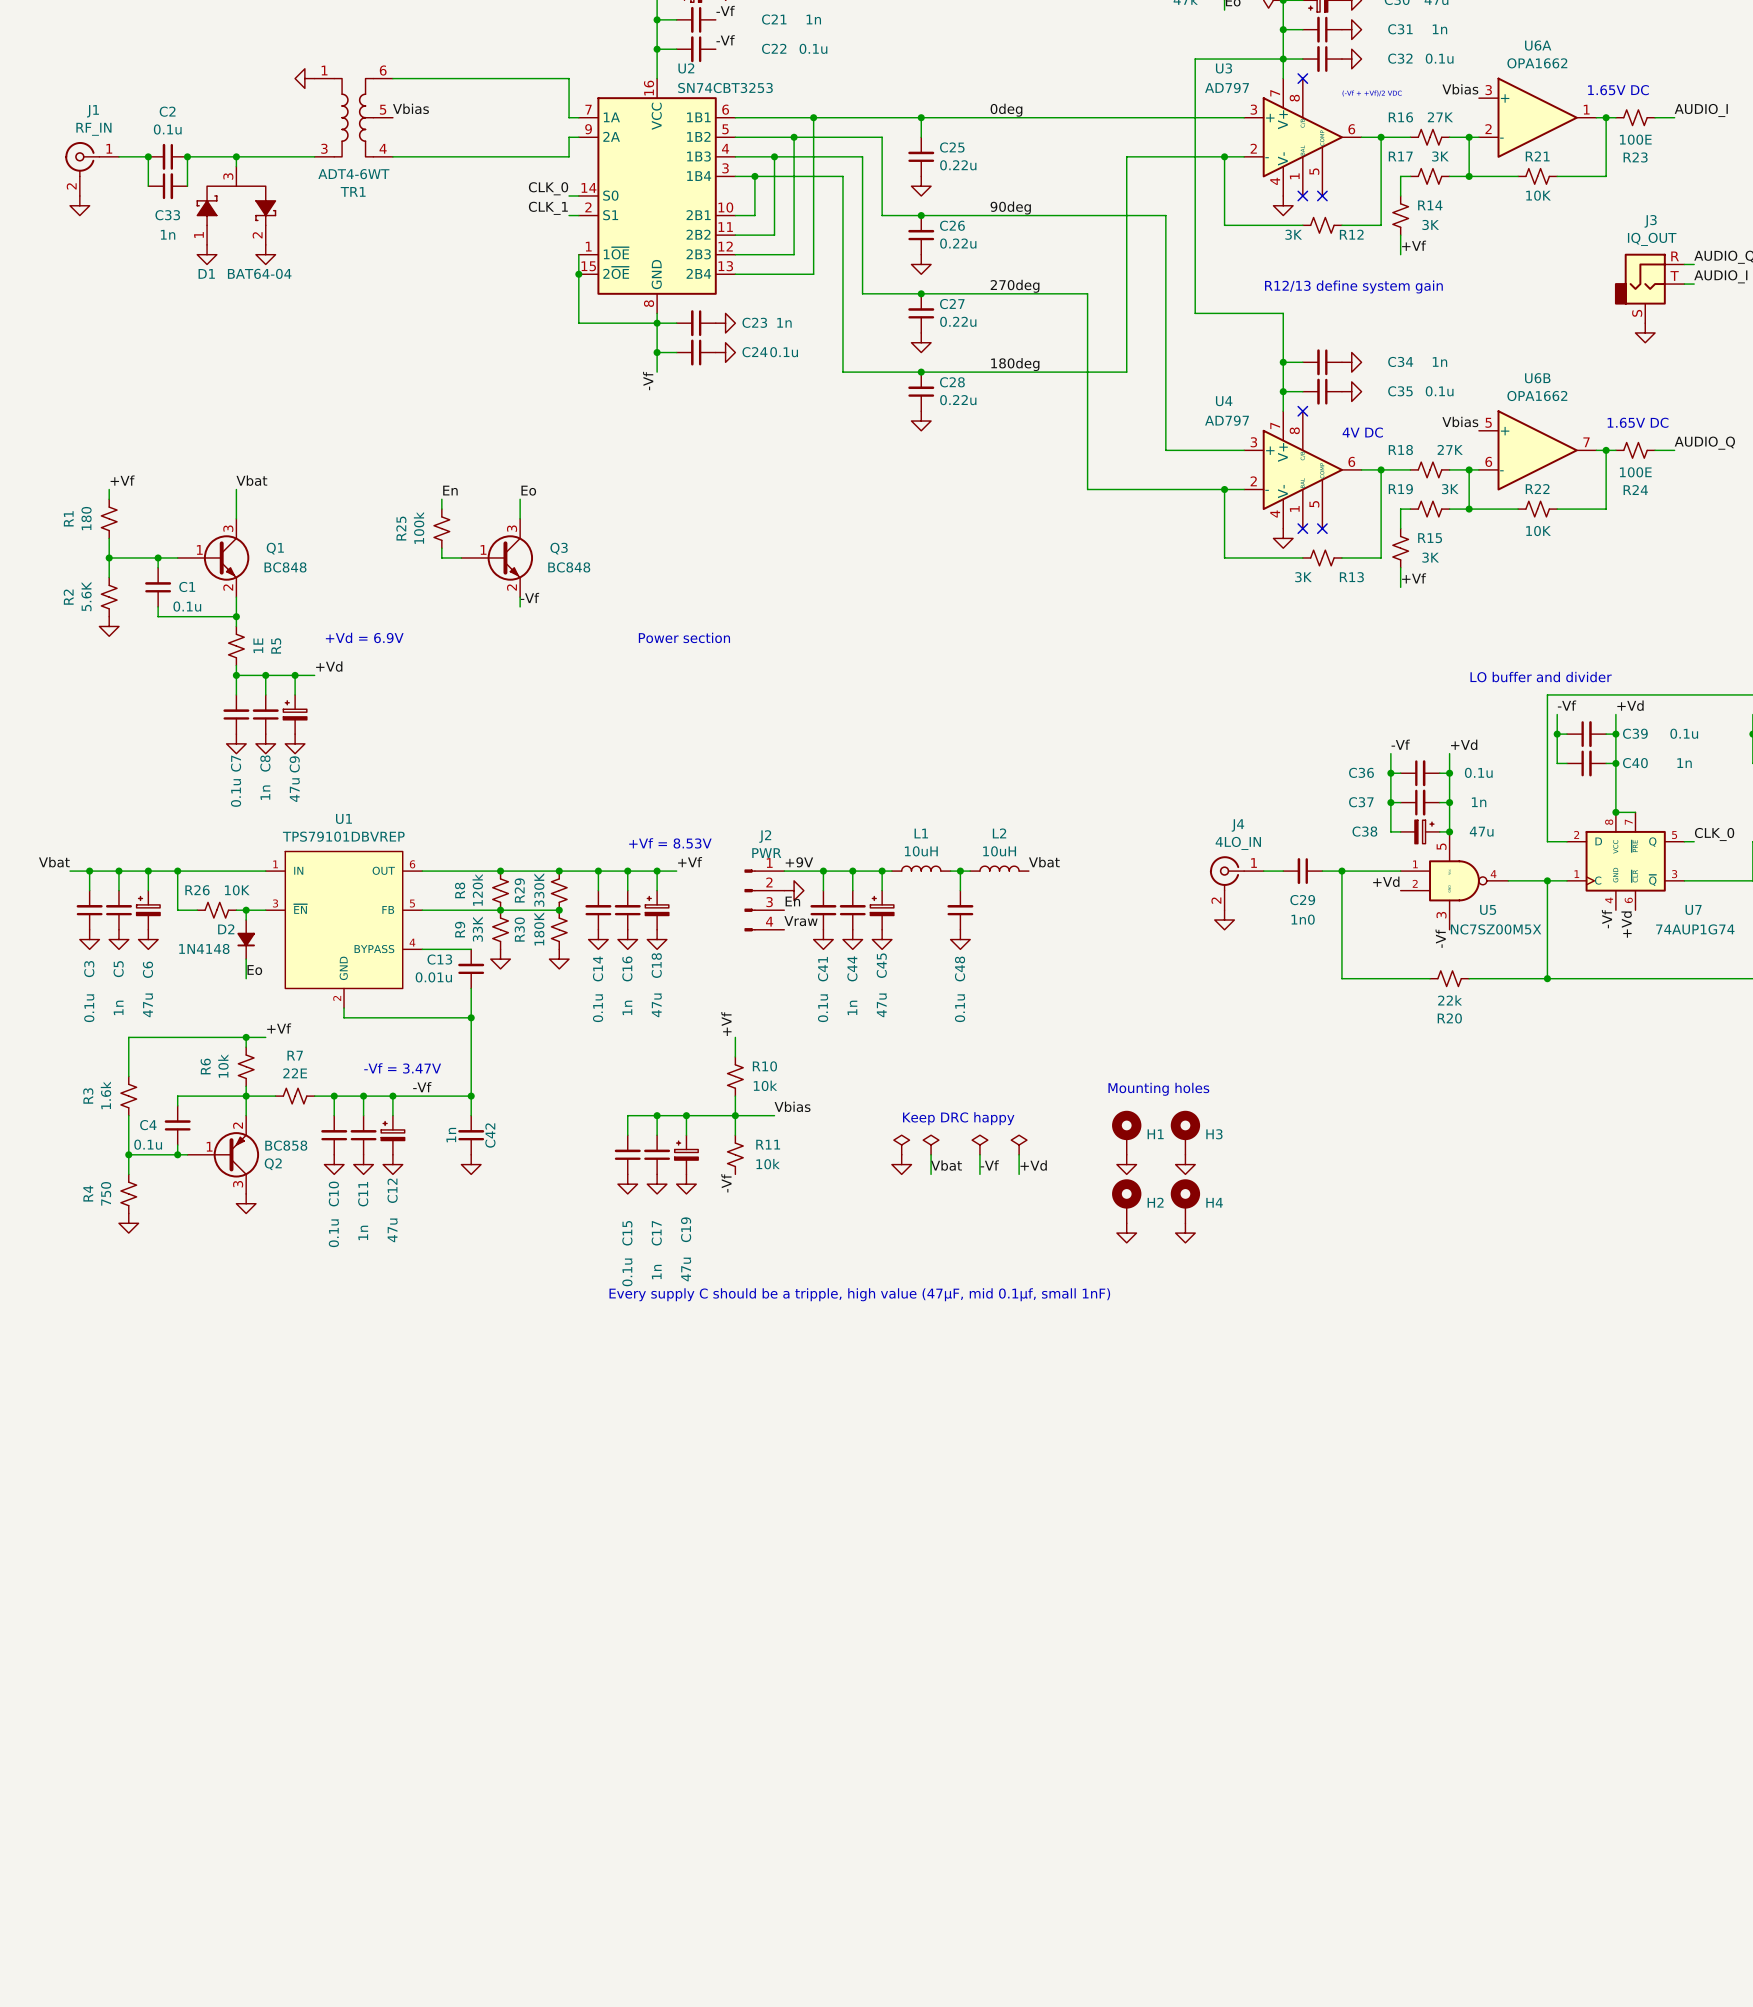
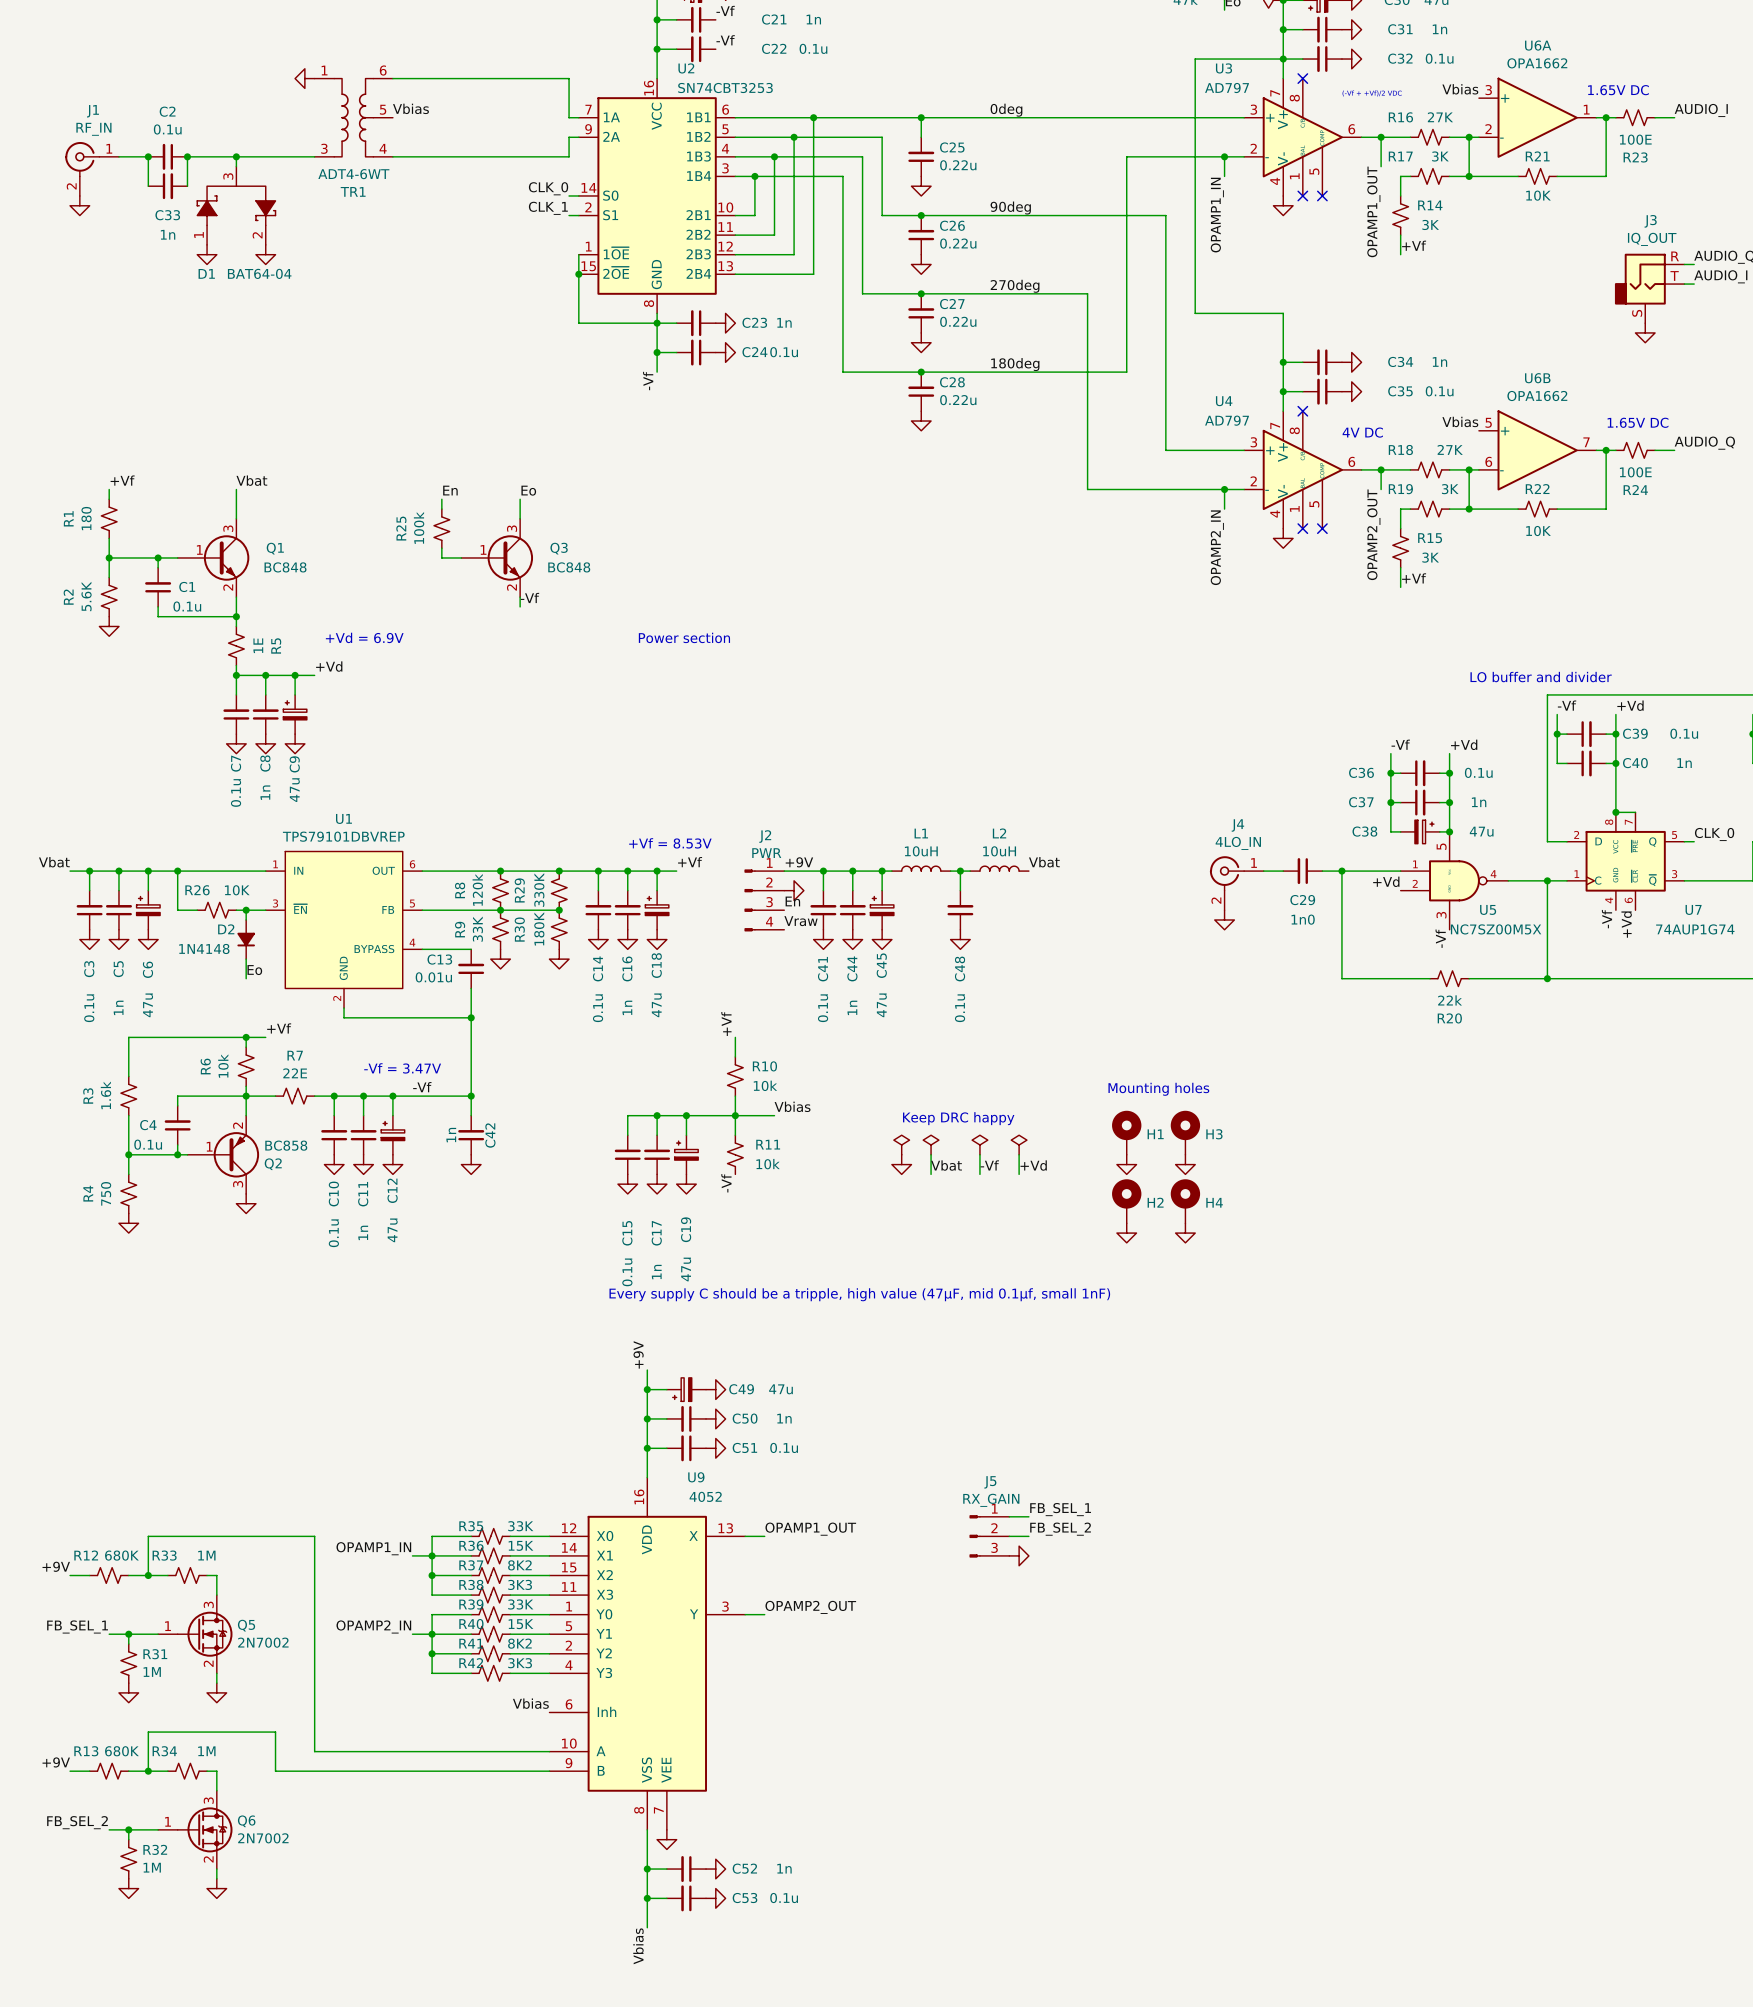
wire: (1381, 166) (1381, 225) (1341, 225) -> none
wire: (1224, 176) (1224, 225) (1302, 225) -> none
label: none -> OPAMP1_OUT (1373, 211)
label: none -> OPAMP1_IN (1217, 215)
R12 position: (1322, 225) -> (109, 1575)
R12 value: 3K (1293, 234) -> 680K (121, 1555)
R12 name position: R12 (1351, 234) -> R12 (86, 1555)
text: R12/13 define system gain (1353, 287) -> none
wire: (1381, 489) (1381, 557) (1341, 557) -> none
wire: (1224, 509) (1224, 557) (1302, 557) -> none
label: none -> OPAMP2_OUT (1373, 534)
label: none -> OPAMP2_IN (1217, 547)
R13 position: (1322, 557) -> (109, 1771)
R13 value: 3K (1303, 577) -> 680K (121, 1751)
R13 name position: R13 (1351, 577) -> R13 (86, 1751)
label: none -> +9V (638, 1354)
wire: none -> (647, 1370) (647, 1477)
wire: none -> (647, 1389) (666, 1389)
junction: none -> (647, 1389)
C49: none -> 47u (686, 1389)
power symbol: none -> (715, 1389)
wire: none -> (647, 1418) (666, 1418)
junction: none -> (647, 1418)
C50: none -> 1n (686, 1418)
power symbol: none -> (715, 1418)
wire: none -> (647, 1448) (666, 1448)
junction: none -> (647, 1448)
C51: none -> 0.1u (686, 1448)
power symbol: none -> (715, 1448)
label: none -> FB_SEL_1 (1060, 1509)
wire: none -> (1009, 1516) (1028, 1516)
label: none -> OPAMP1_OUT (810, 1529)
label: none -> FB_SEL_2 (1060, 1529)
wire: none -> (471, 1536) (432, 1536) (432, 1595) (471, 1595)
R35: none -> 33K (490, 1536)
wire: none -> (510, 1536) (549, 1536)
wire: none -> (745, 1536) (764, 1536)
J5: none -> RX_GAIN (989, 1536)
wire: none -> (1009, 1536) (1028, 1536)
label: none -> OPAMP1_IN (373, 1548)
wire: none -> (412, 1555) (471, 1555)
junction: none -> (432, 1555)
R36: none -> 15K (490, 1555)
wire: none -> (510, 1555) (549, 1555)
power symbol: none -> (1019, 1555)
label: none -> +9V (56, 1566)
wire: none -> (70, 1575) (89, 1575)
wire: none -> (128, 1575) (167, 1575)
wire: none -> (148, 1575) (148, 1536) (314, 1536) (314, 1751) (549, 1751)
junction: none -> (148, 1575)
R33: none -> 1M (187, 1575)
wire: none -> (207, 1575) (216, 1575) (216, 1595)
wire: none -> (432, 1575) (471, 1575)
junction: none -> (432, 1575)
R37: none -> 8K2 (490, 1575)
wire: none -> (510, 1575) (549, 1575)
R38: none -> 3K3 (490, 1595)
wire: none -> (510, 1595) (549, 1595)
label: none -> OPAMP2_OUT (810, 1607)
wire: none -> (471, 1614) (432, 1614) (432, 1673) (471, 1673)
R39: none -> 33K (490, 1614)
wire: none -> (510, 1614) (549, 1614)
wire: none -> (745, 1614) (764, 1614)
label: none -> FB_SEL_1 (77, 1626)
label: none -> OPAMP2_IN (373, 1626)
wire: none -> (109, 1634) (158, 1634)
wire: none -> (128, 1634) (128, 1644)
junction: none -> (128, 1634)
Q5: none -> 2N7002 (195, 1634)
wire: none -> (412, 1634) (471, 1634)
junction: none -> (432, 1634)
R40: none -> 15K (490, 1634)
wire: none -> (510, 1634) (549, 1634)
wire: none -> (432, 1653) (471, 1653)
junction: none -> (432, 1653)
R41: none -> 8K2 (490, 1653)
wire: none -> (510, 1653) (549, 1653)
U9: none -> 4052 (647, 1653)
R31: none -> 1M (128, 1663)
wire: none -> (216, 1673) (216, 1683)
R42: none -> 3K3 (490, 1673)
wire: none -> (510, 1673) (549, 1673)
power symbol: none -> (128, 1692)
power symbol: none -> (216, 1692)
label: none -> Vbias (530, 1703)
label: none -> +9V (56, 1762)
wire: none -> (70, 1771) (89, 1771)
wire: none -> (128, 1771) (167, 1771)
wire: none -> (148, 1771) (148, 1732) (275, 1732) (275, 1771) (549, 1771)
junction: none -> (148, 1771)
R34: none -> 1M (187, 1771)
wire: none -> (207, 1771) (216, 1771) (216, 1790)
label: none -> FB_SEL_2 (77, 1822)
wire: none -> (109, 1829) (158, 1829)
wire: none -> (128, 1829) (128, 1839)
junction: none -> (128, 1829)
Q6: none -> 2N7002 (195, 1829)
wire: none -> (647, 1829) (647, 1927)
power symbol: none -> (666, 1839)
R32: none -> 1M (128, 1859)
wire: none -> (216, 1869) (216, 1878)
wire: none -> (647, 1869) (666, 1869)
junction: none -> (647, 1869)
C52: none -> 1n (686, 1869)
power symbol: none -> (715, 1869)
power symbol: none -> (128, 1888)
power symbol: none -> (216, 1888)
wire: none -> (647, 1898) (666, 1898)
junction: none -> (647, 1898)
C53: none -> 0.1u (686, 1898)
power symbol: none -> (715, 1898)
label: none -> Vbias (638, 1946)

